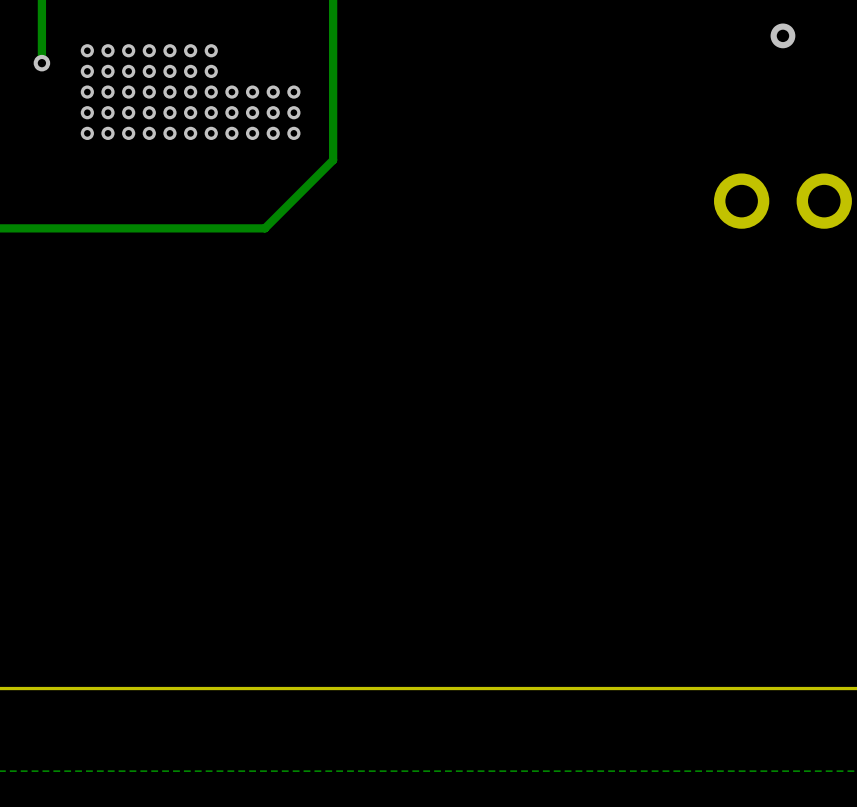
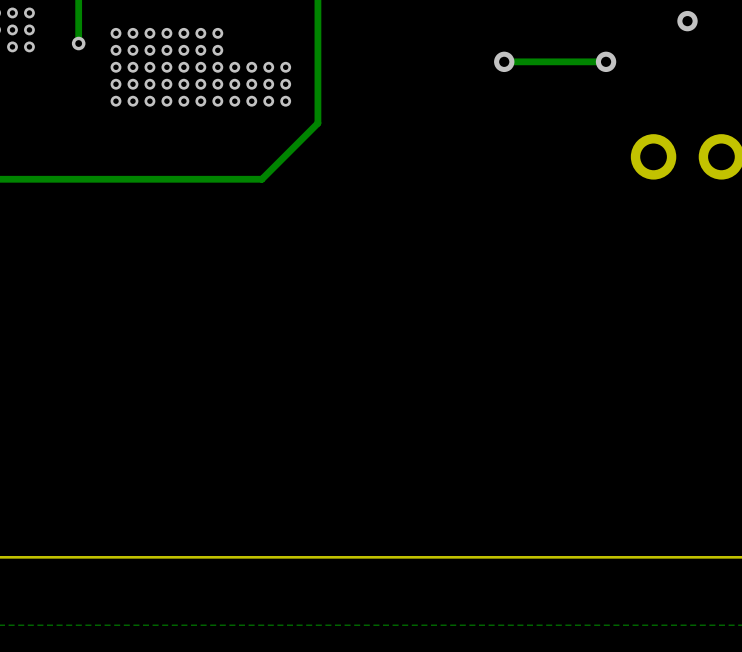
via: none -> (504, 61)
track: none -> (606, 61) (504, 61)
via: none -> (606, 61)

